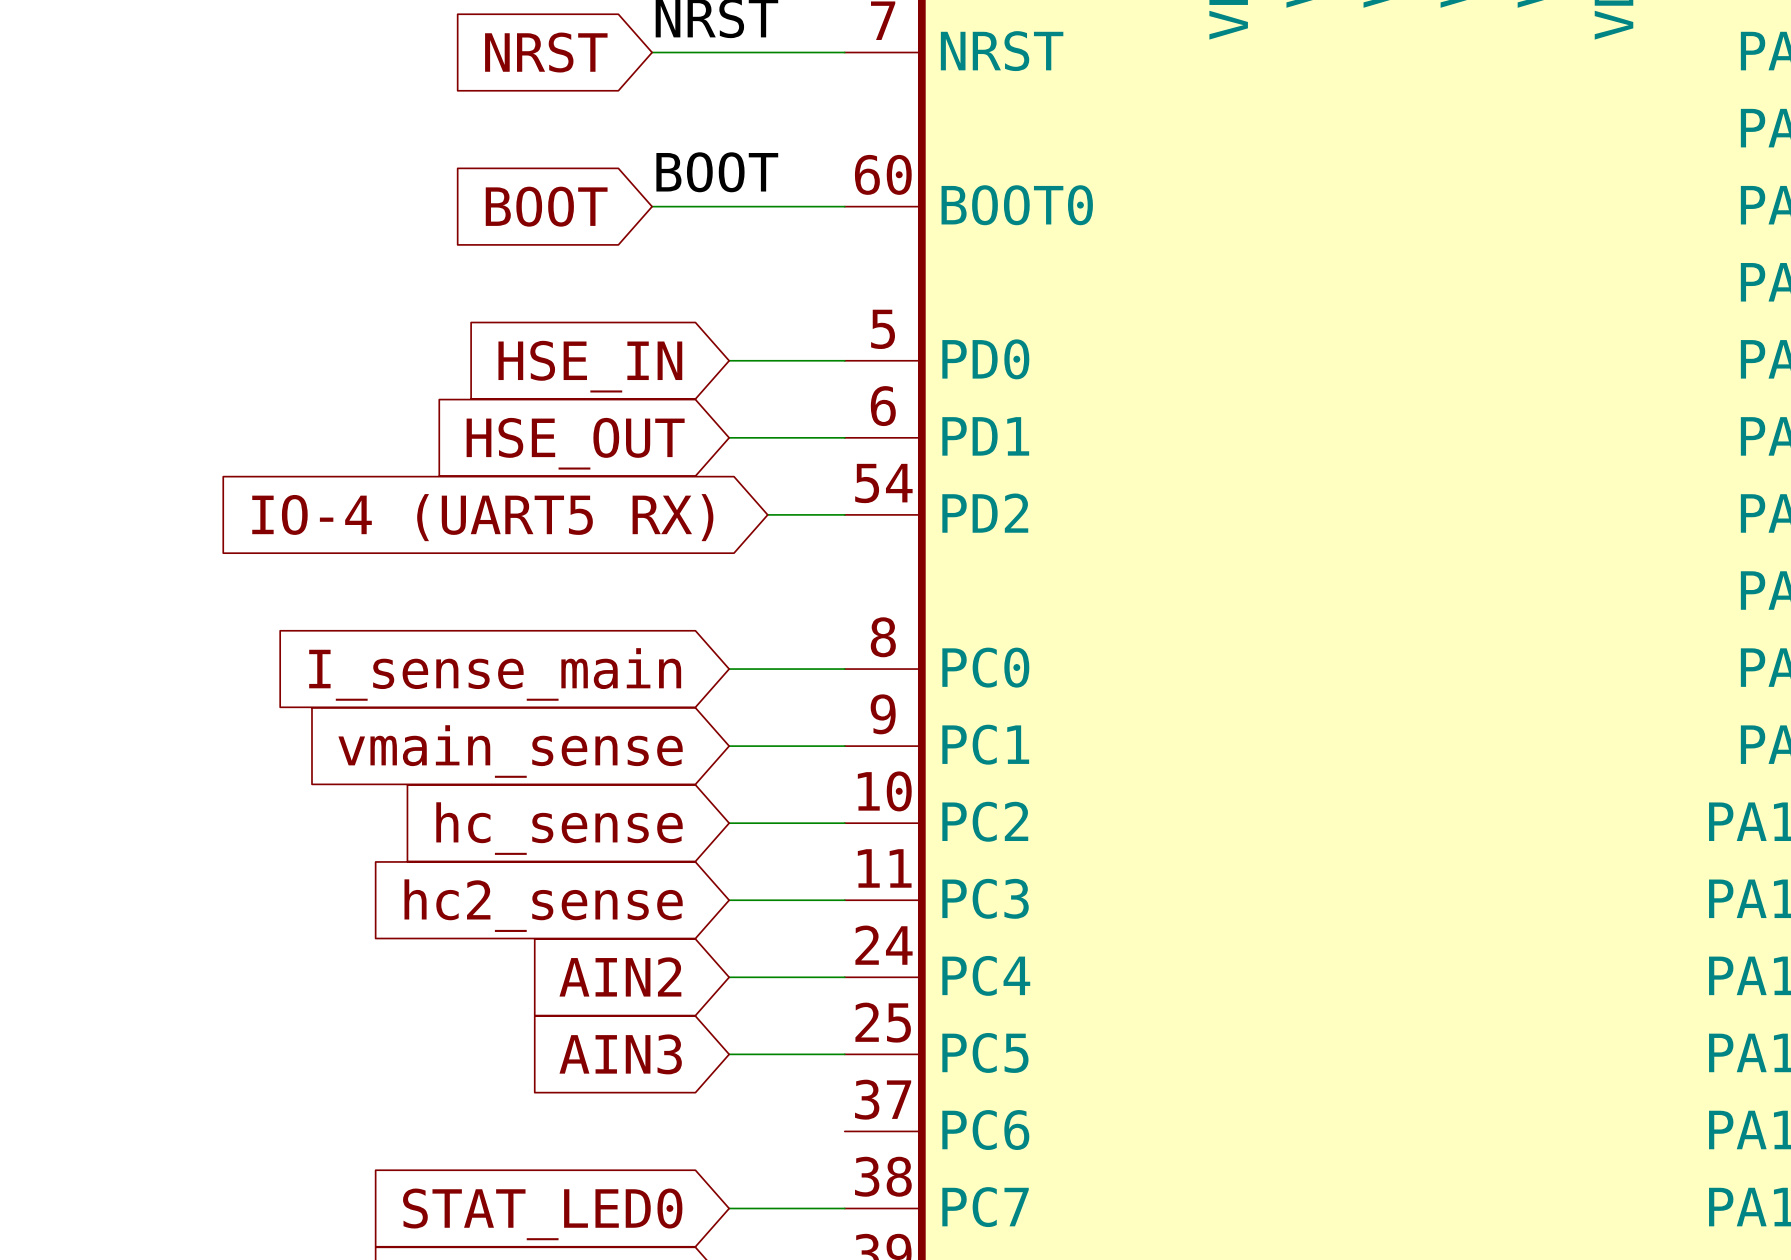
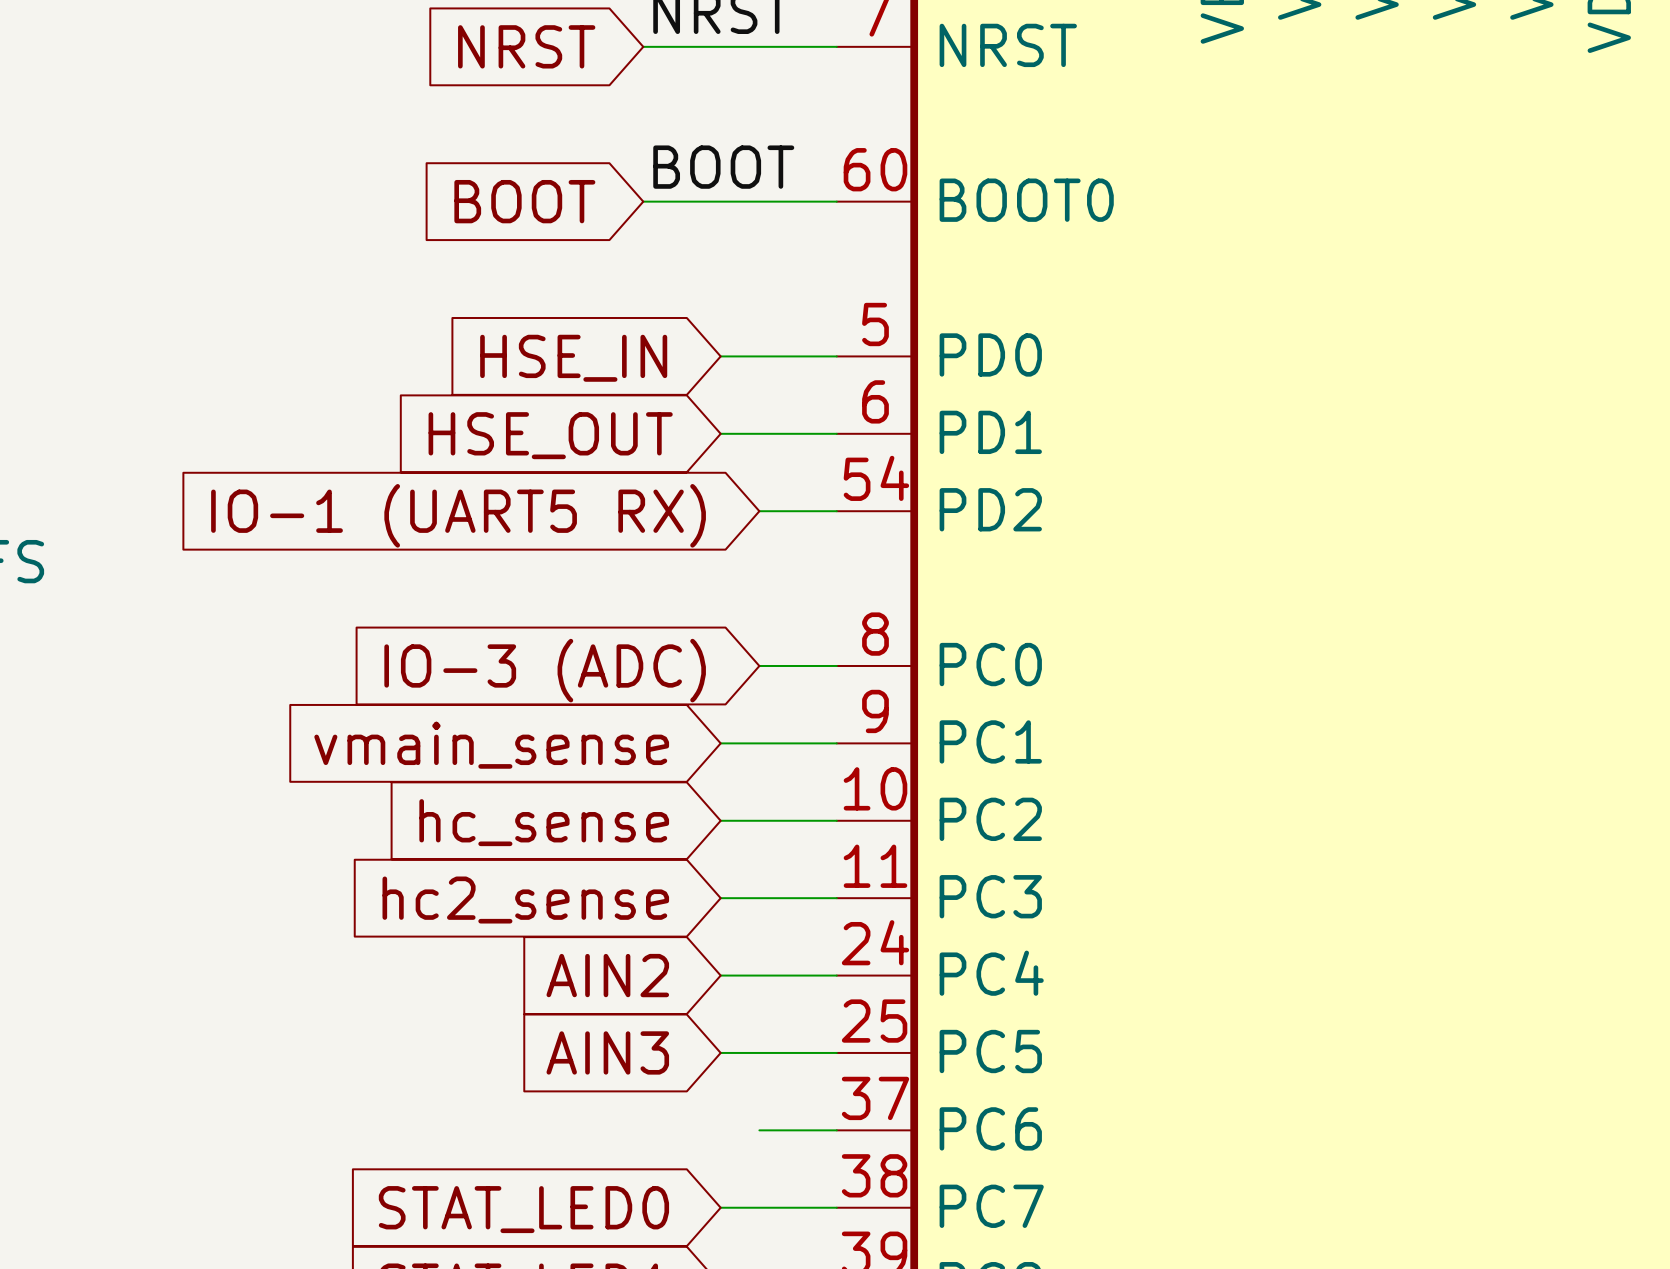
global label: IO-4 (UART5 RX) (482, 517) -> IO-1 (UART5 RX) (458, 515)
wire: (729, 669) (767, 669) -> none
global label: none -> IO-3 (ADC) (545, 670)
global label: I_sense_main (495, 674) -> none
wire: none -> (759, 1130) (836, 1130)

